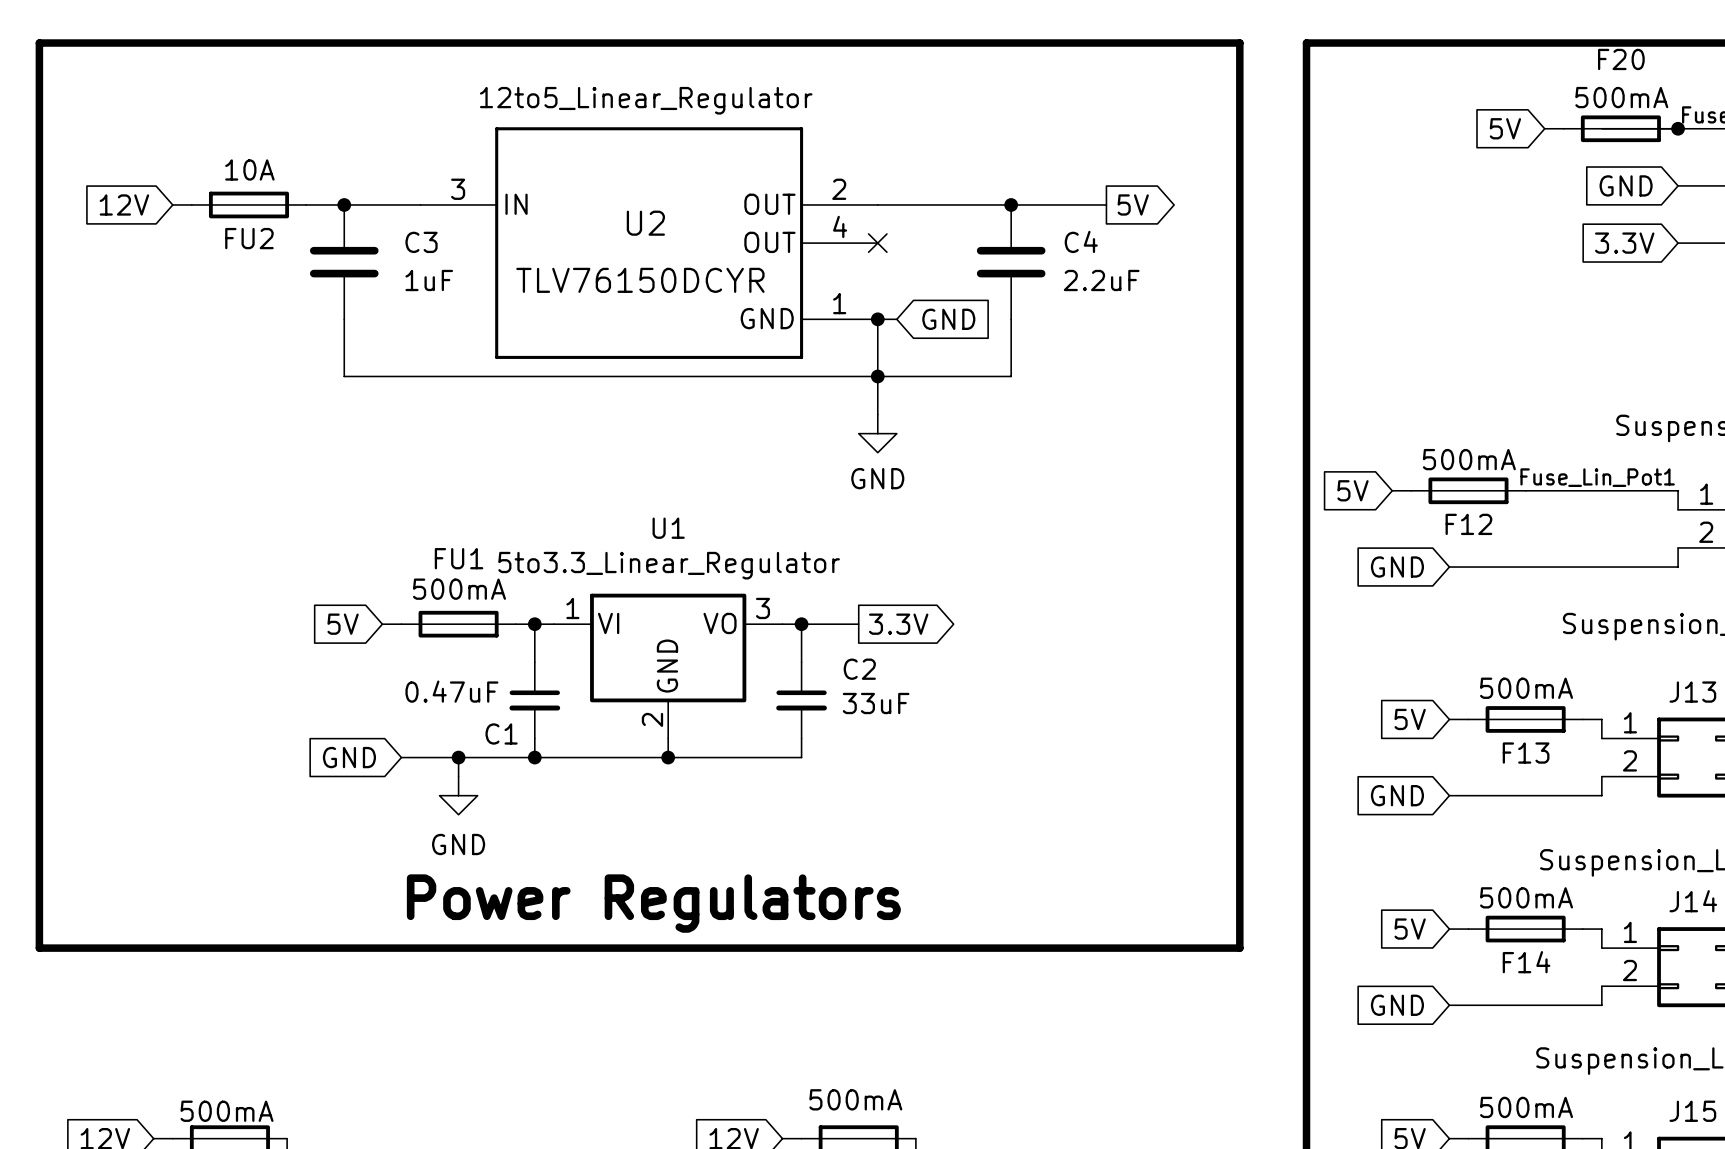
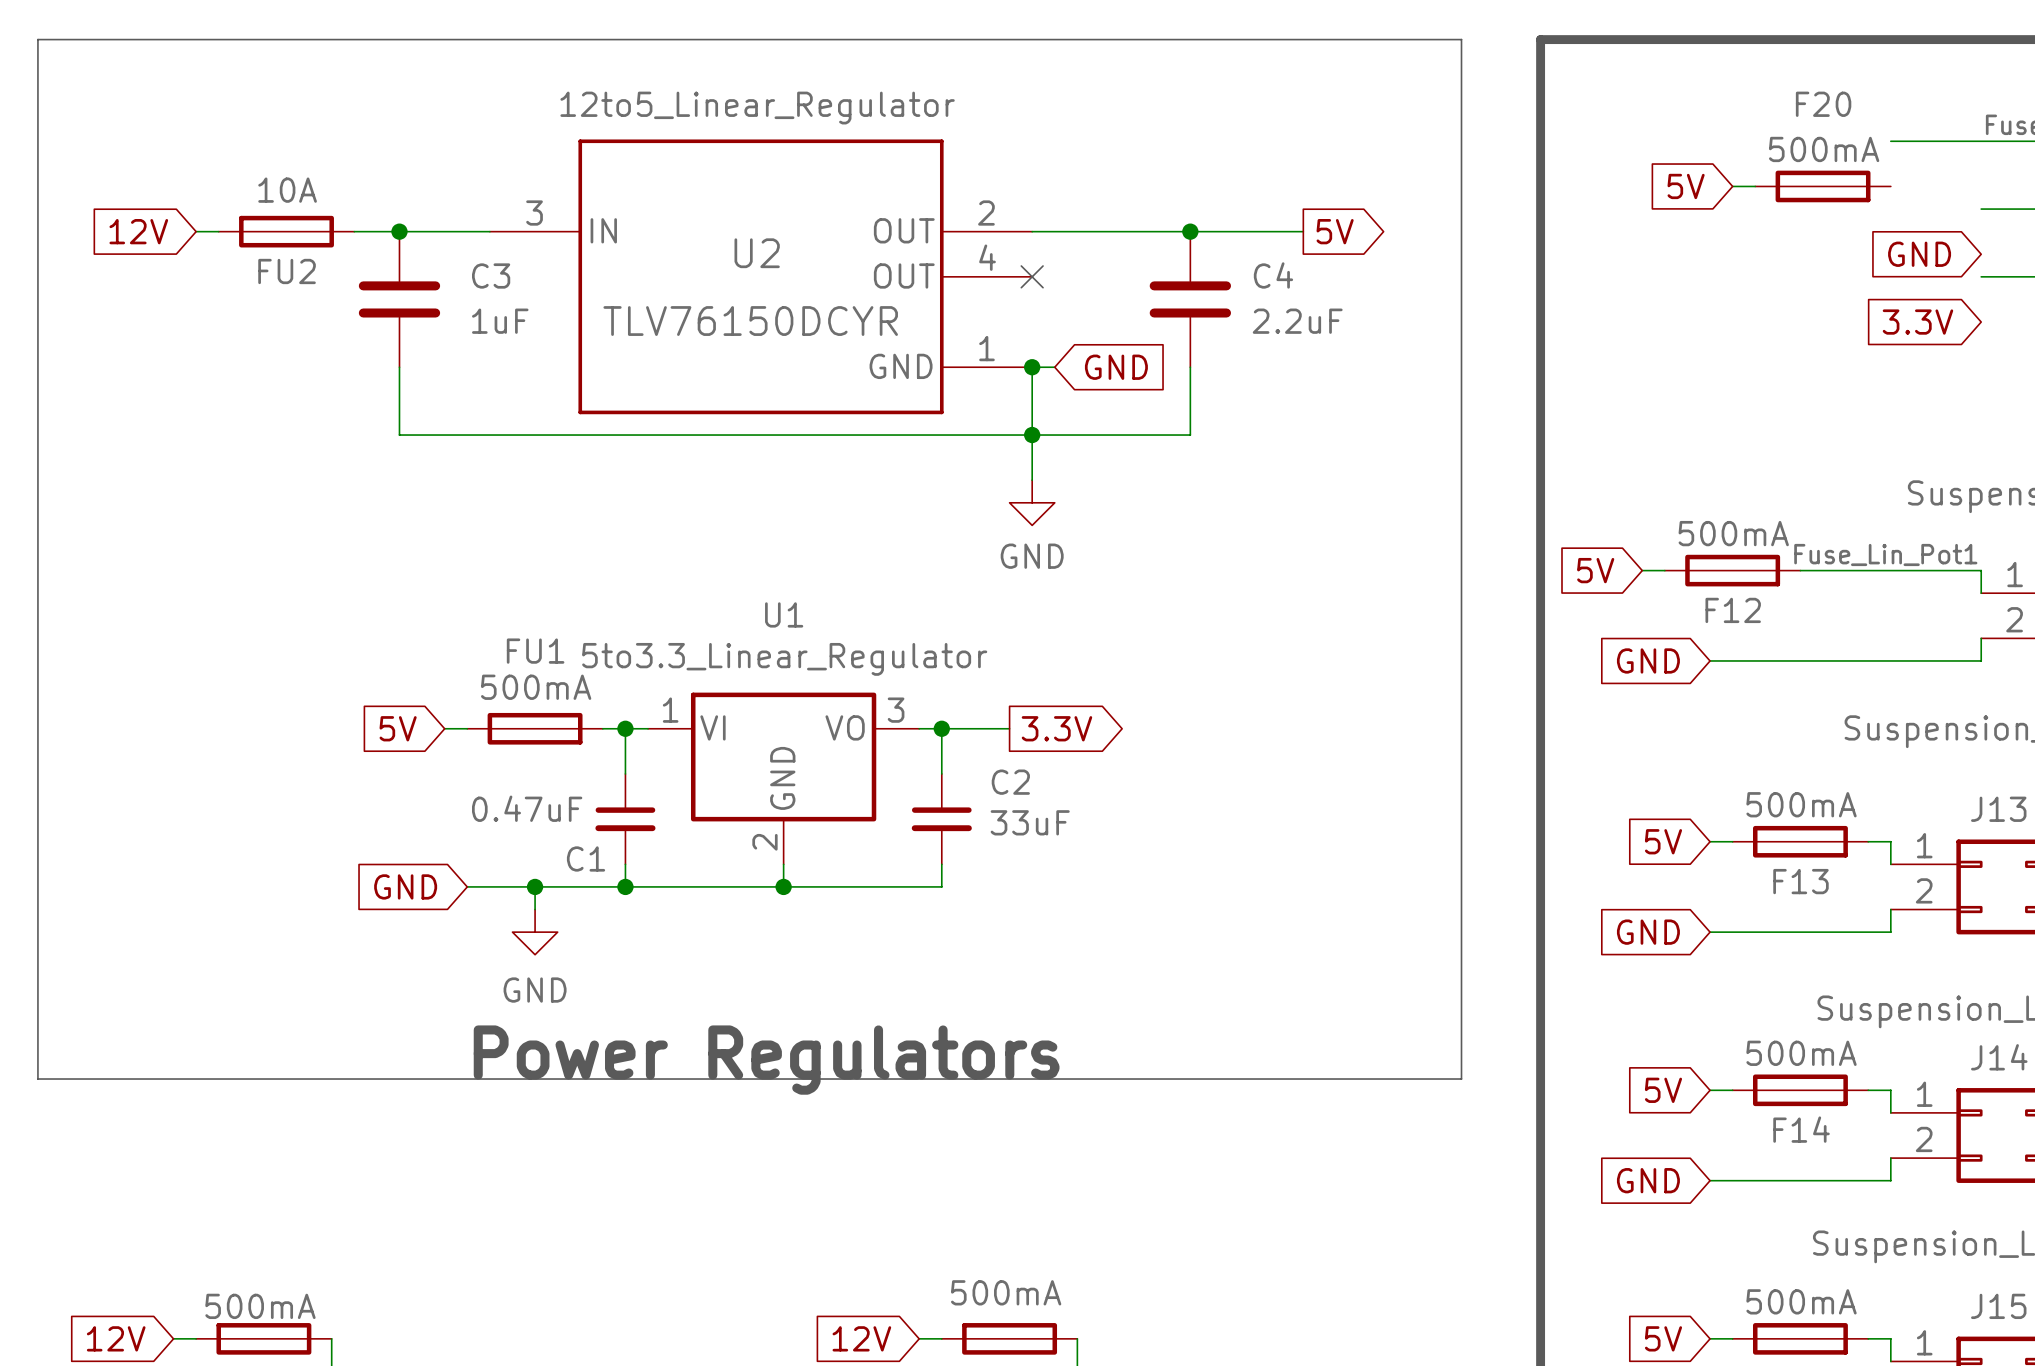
global label position: 5V (1505, 128) -> 5V (1686, 186)
wire: (1544, 128) (1563, 128) -> (1732, 186) (1755, 186)
F20 position: (1620, 128) -> (1823, 186)
junction: (1678, 128) -> none
global label position: GND (1626, 185) -> GND (1919, 254)
global label position: 3.3V (1624, 243) -> 3.3V (1917, 322)
line: (39, 919) (39, 948) (1239, 948) (1239, 919) -> (37, 1079) (1461, 1079)
line width: thick (39, 919) (39, 43) (1239, 43) (1239, 919) -> thin (37, 1079) (37, 39) (1461, 39) (1461, 1079)

